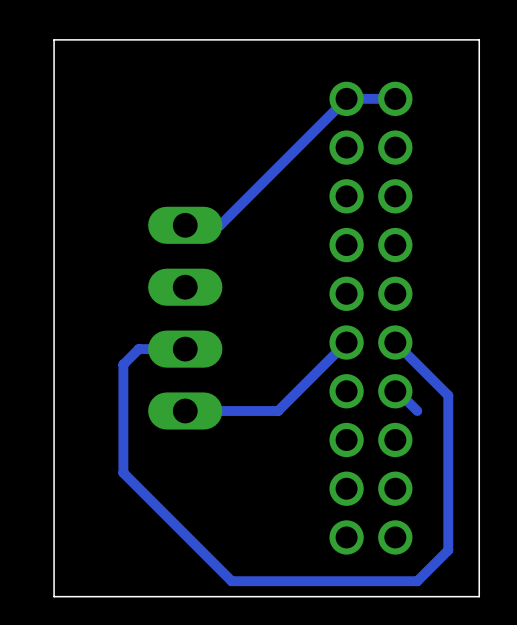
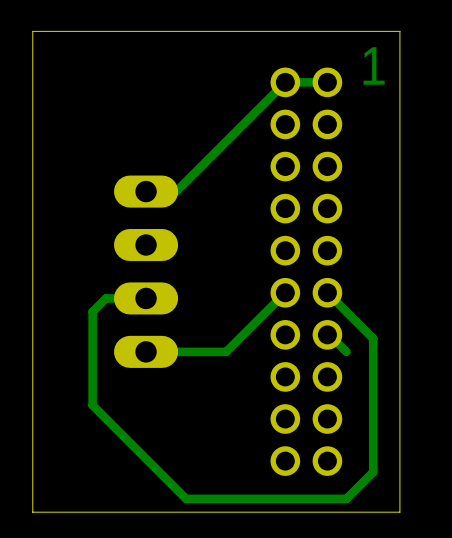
text: none -> 1 (374, 65)

